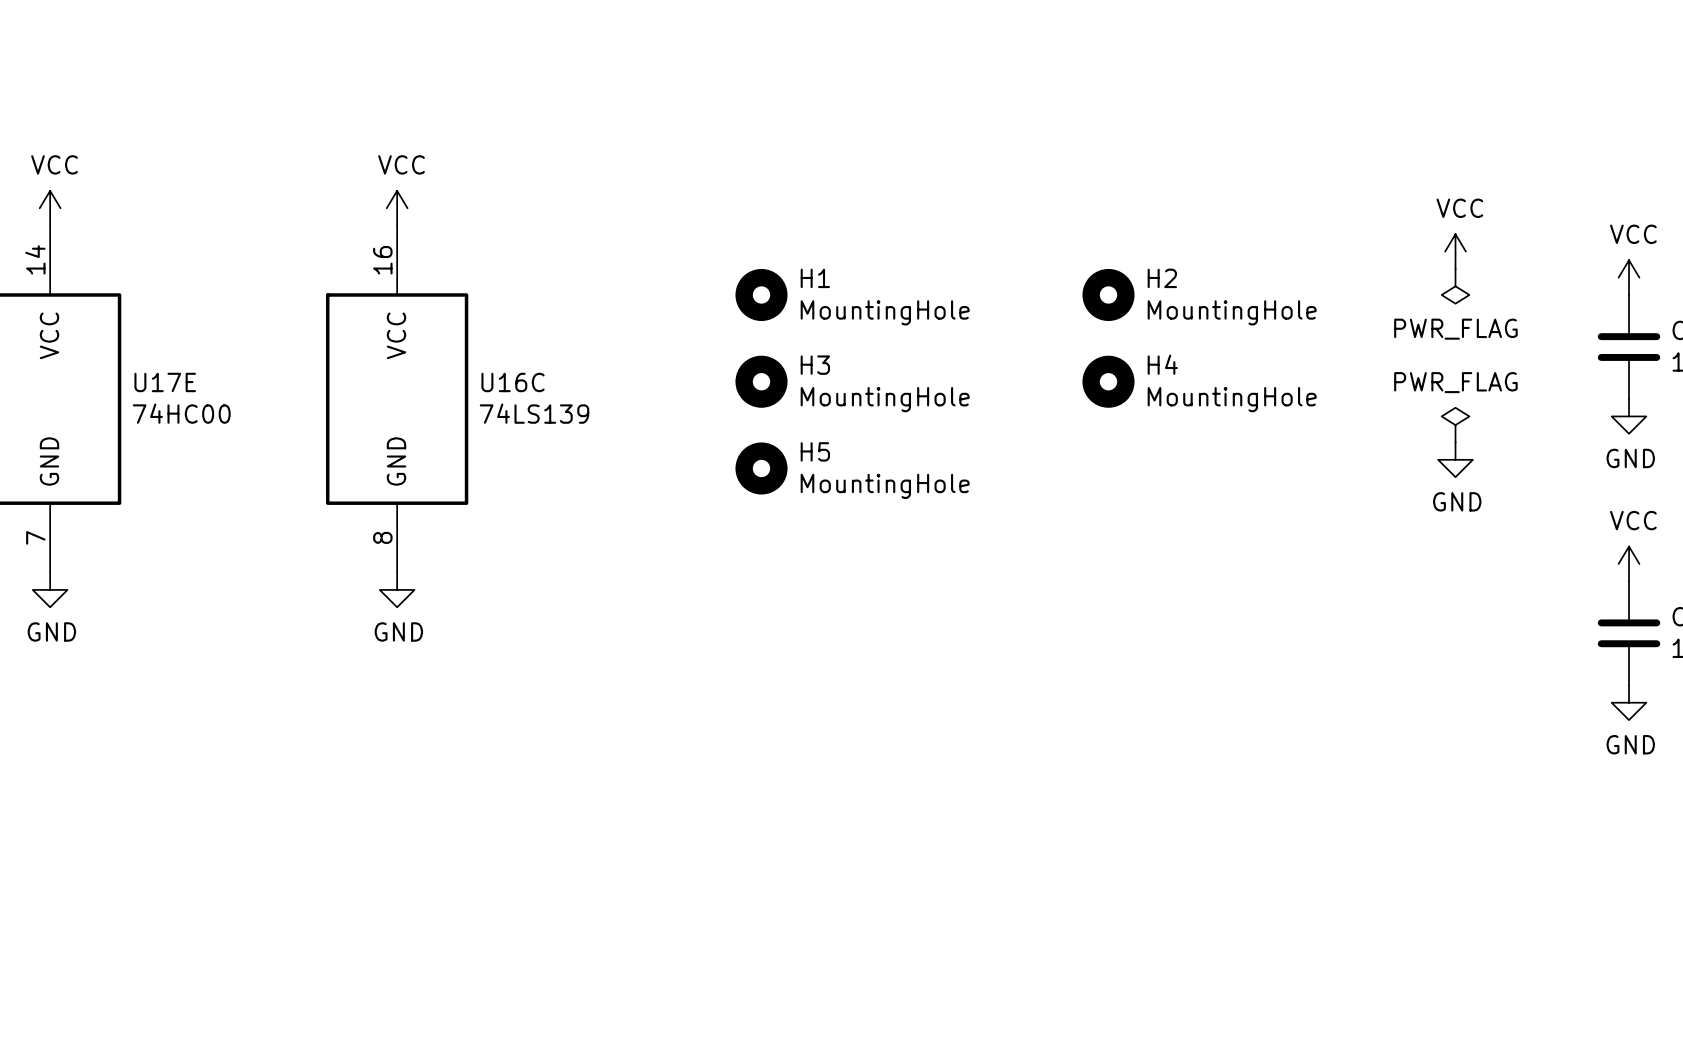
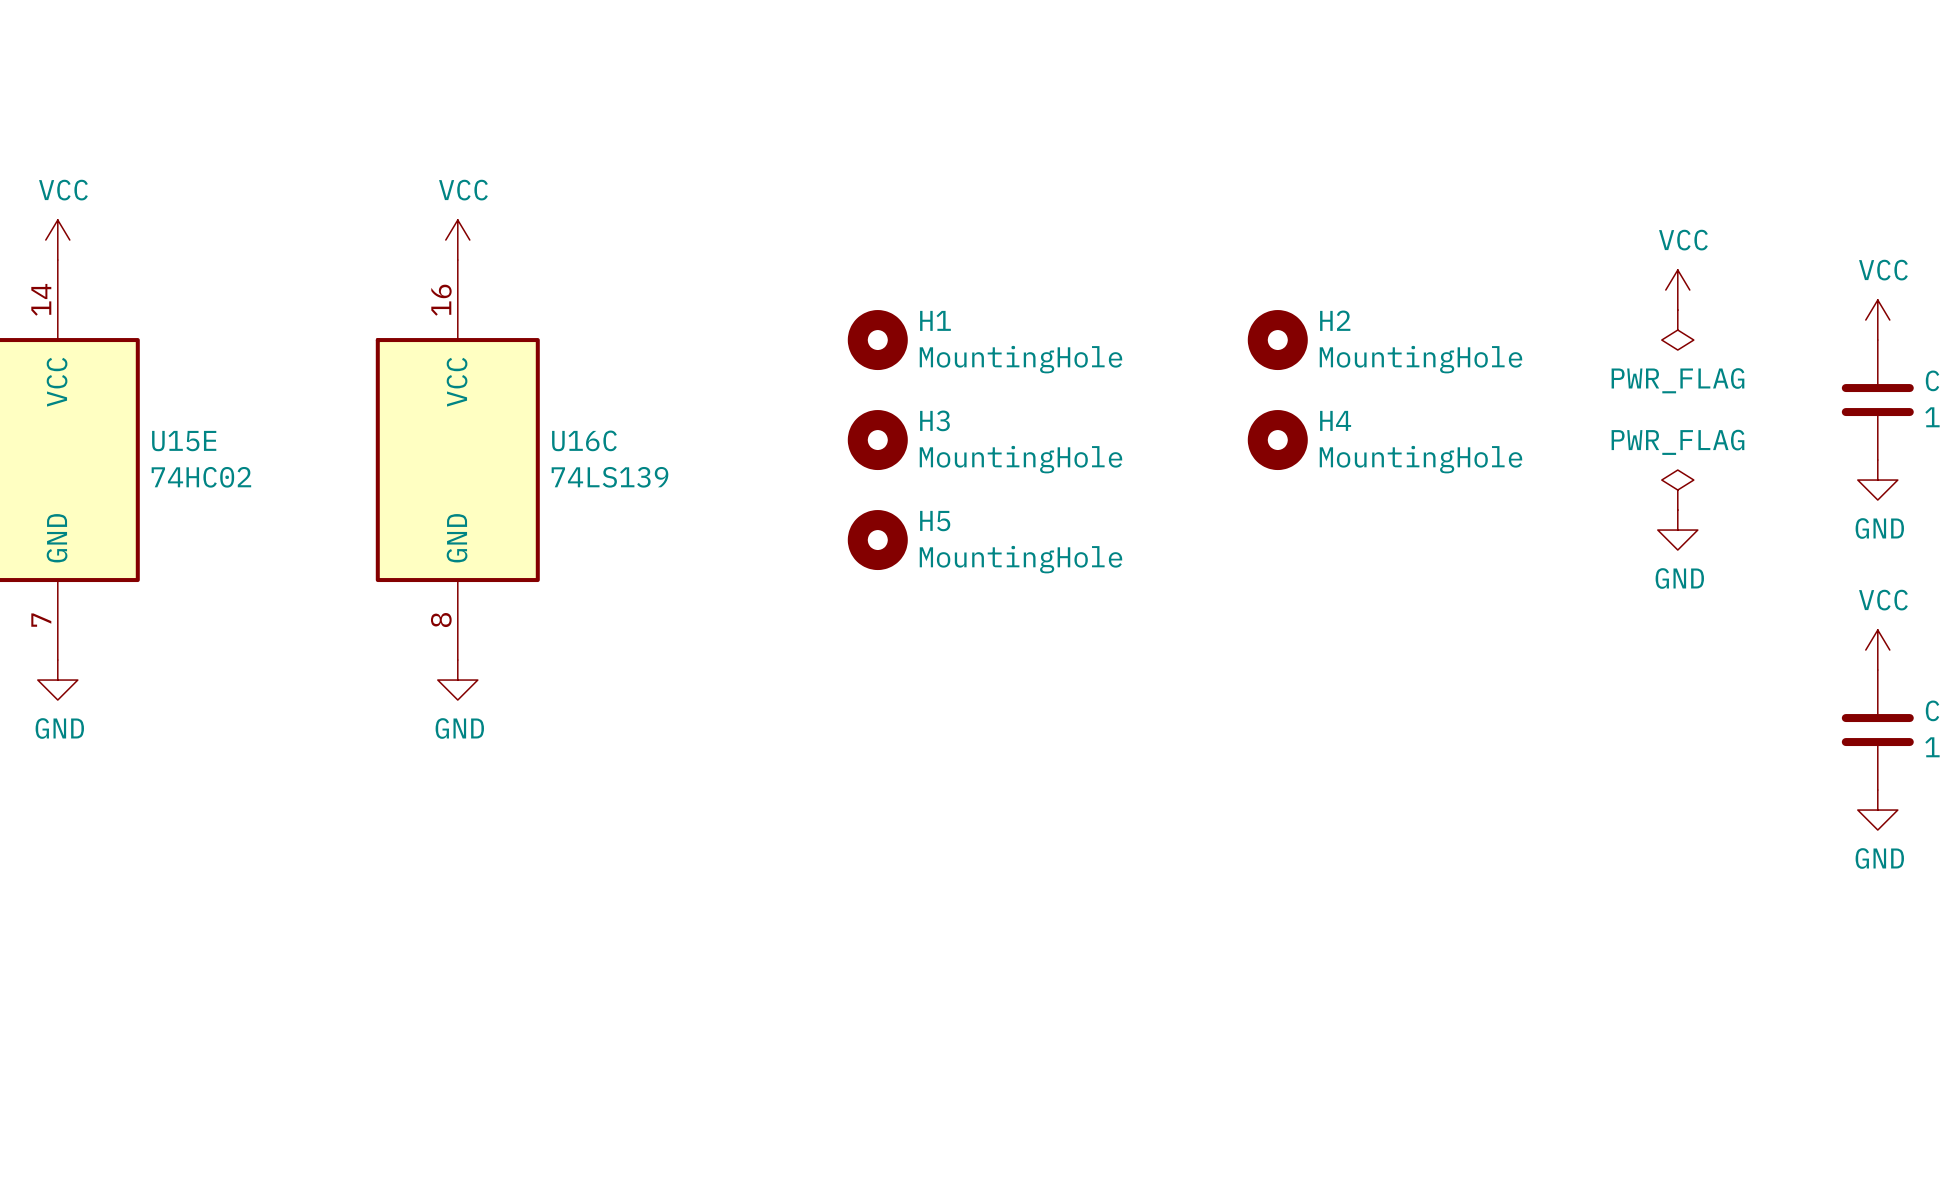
U17E name: U17E (165, 382) -> U15E (184, 441)
U17E value: 74HC00 (181, 413) -> 74HC02 (201, 477)

